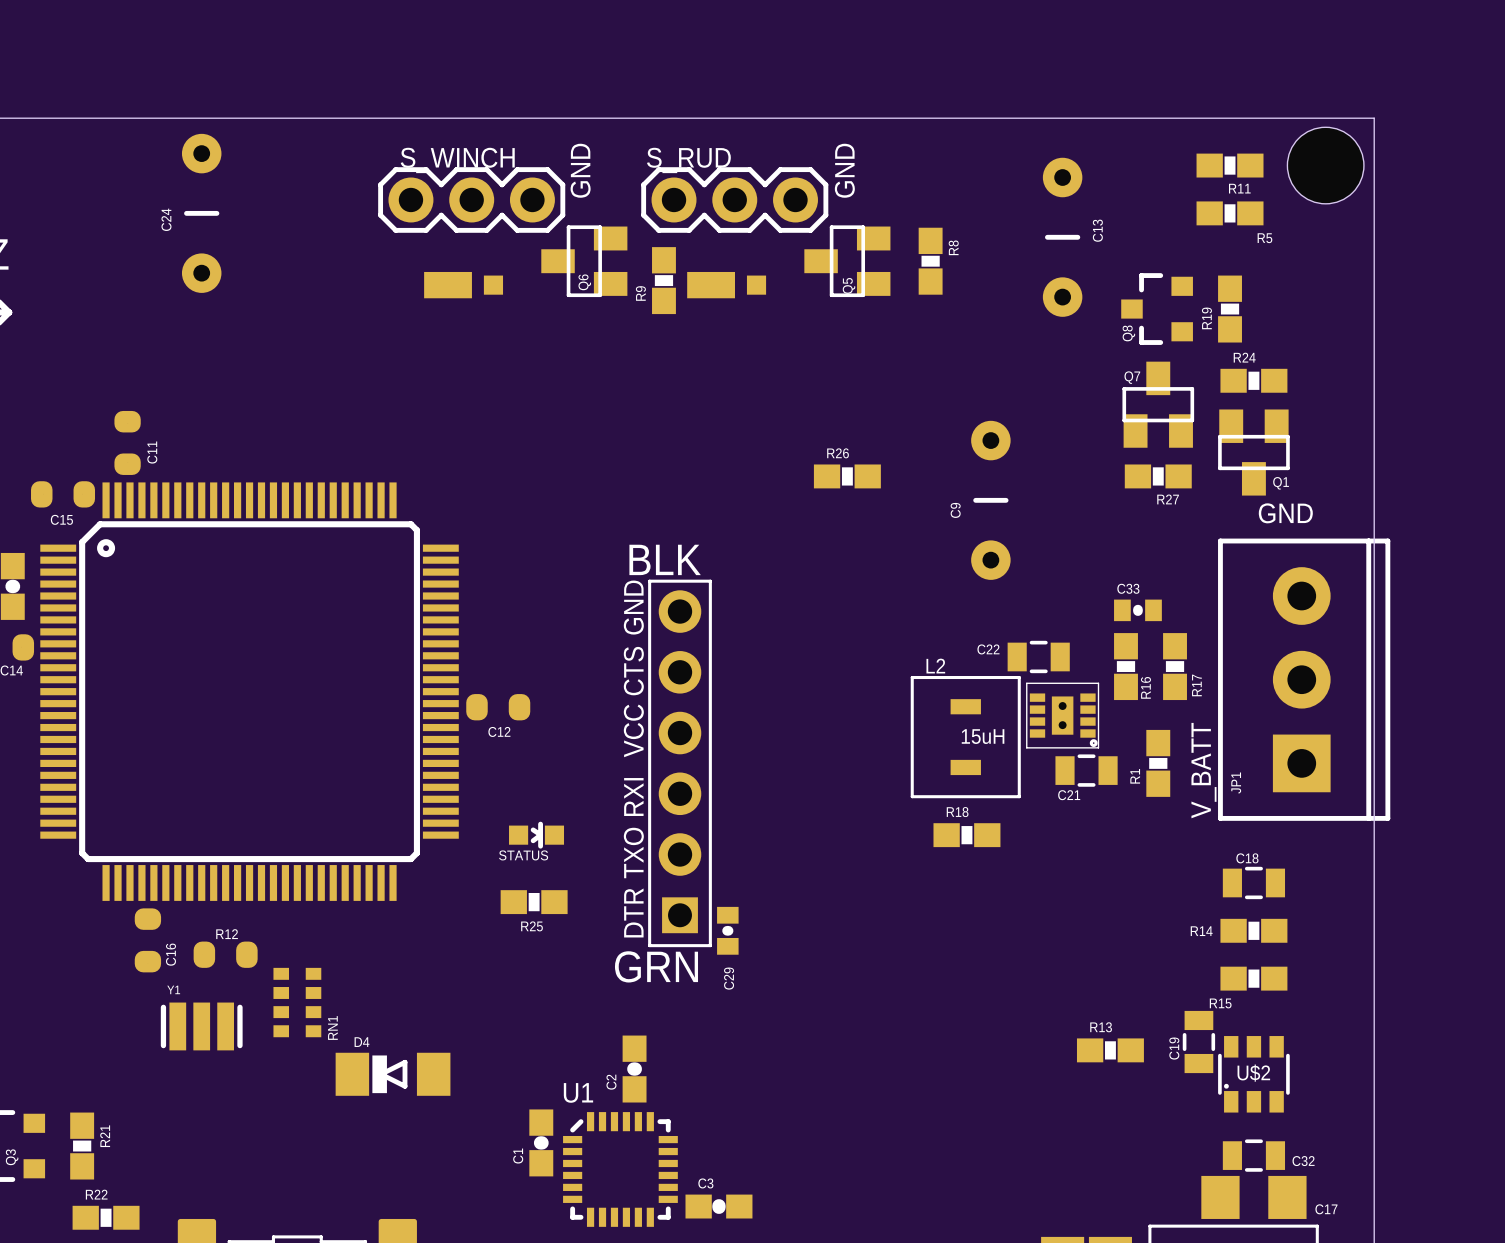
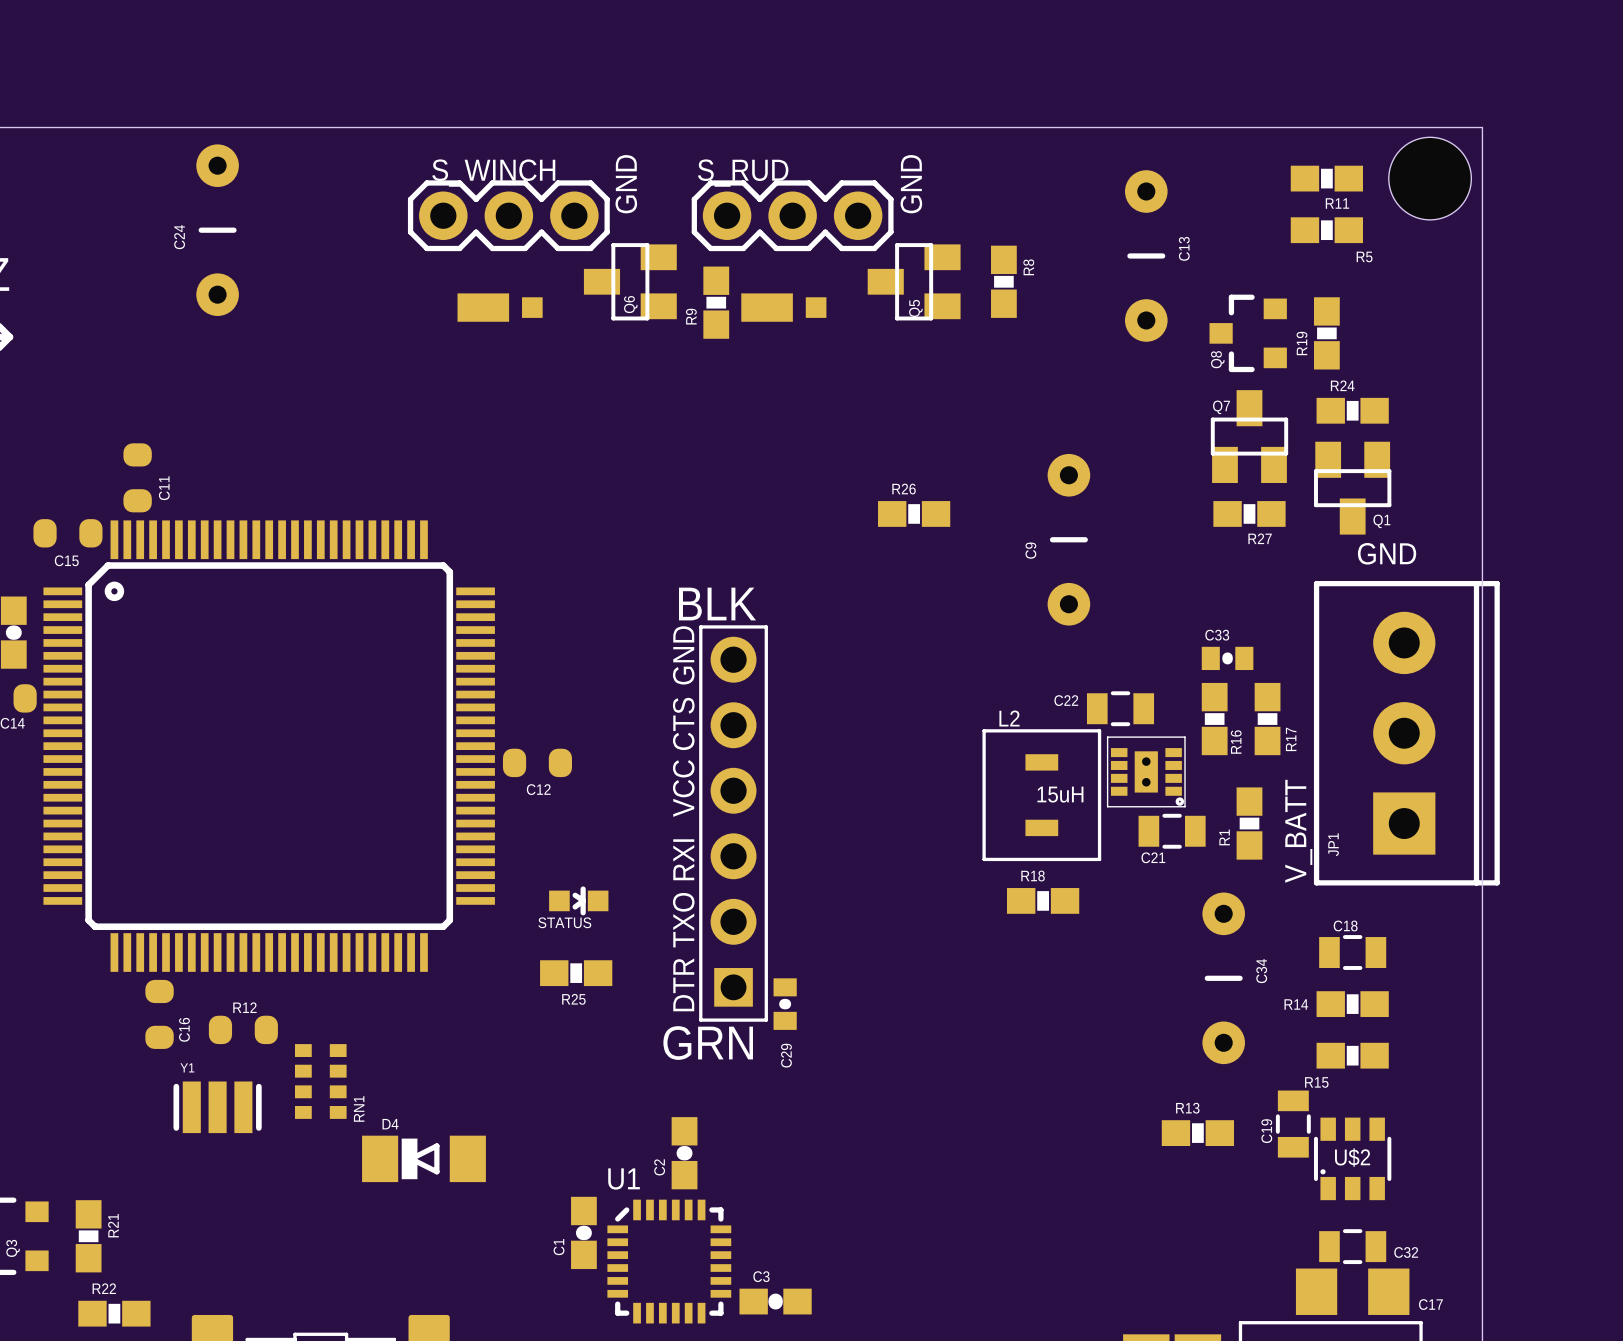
C34: none -> (1223, 978)

